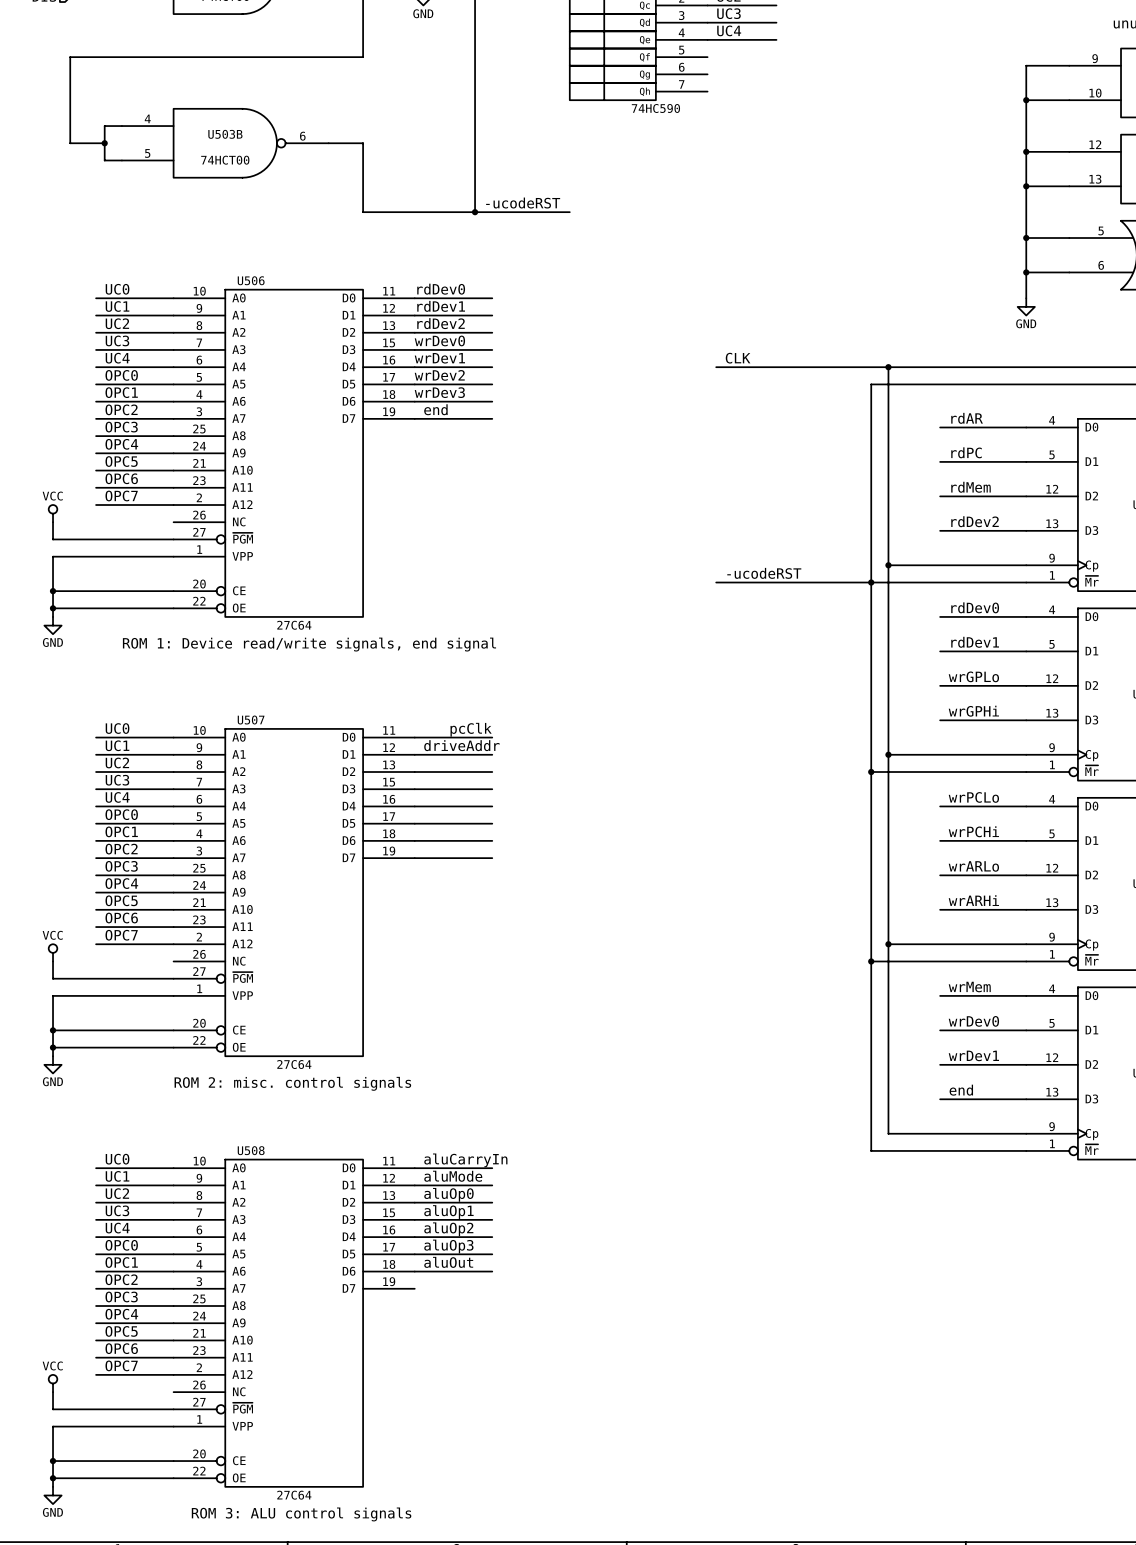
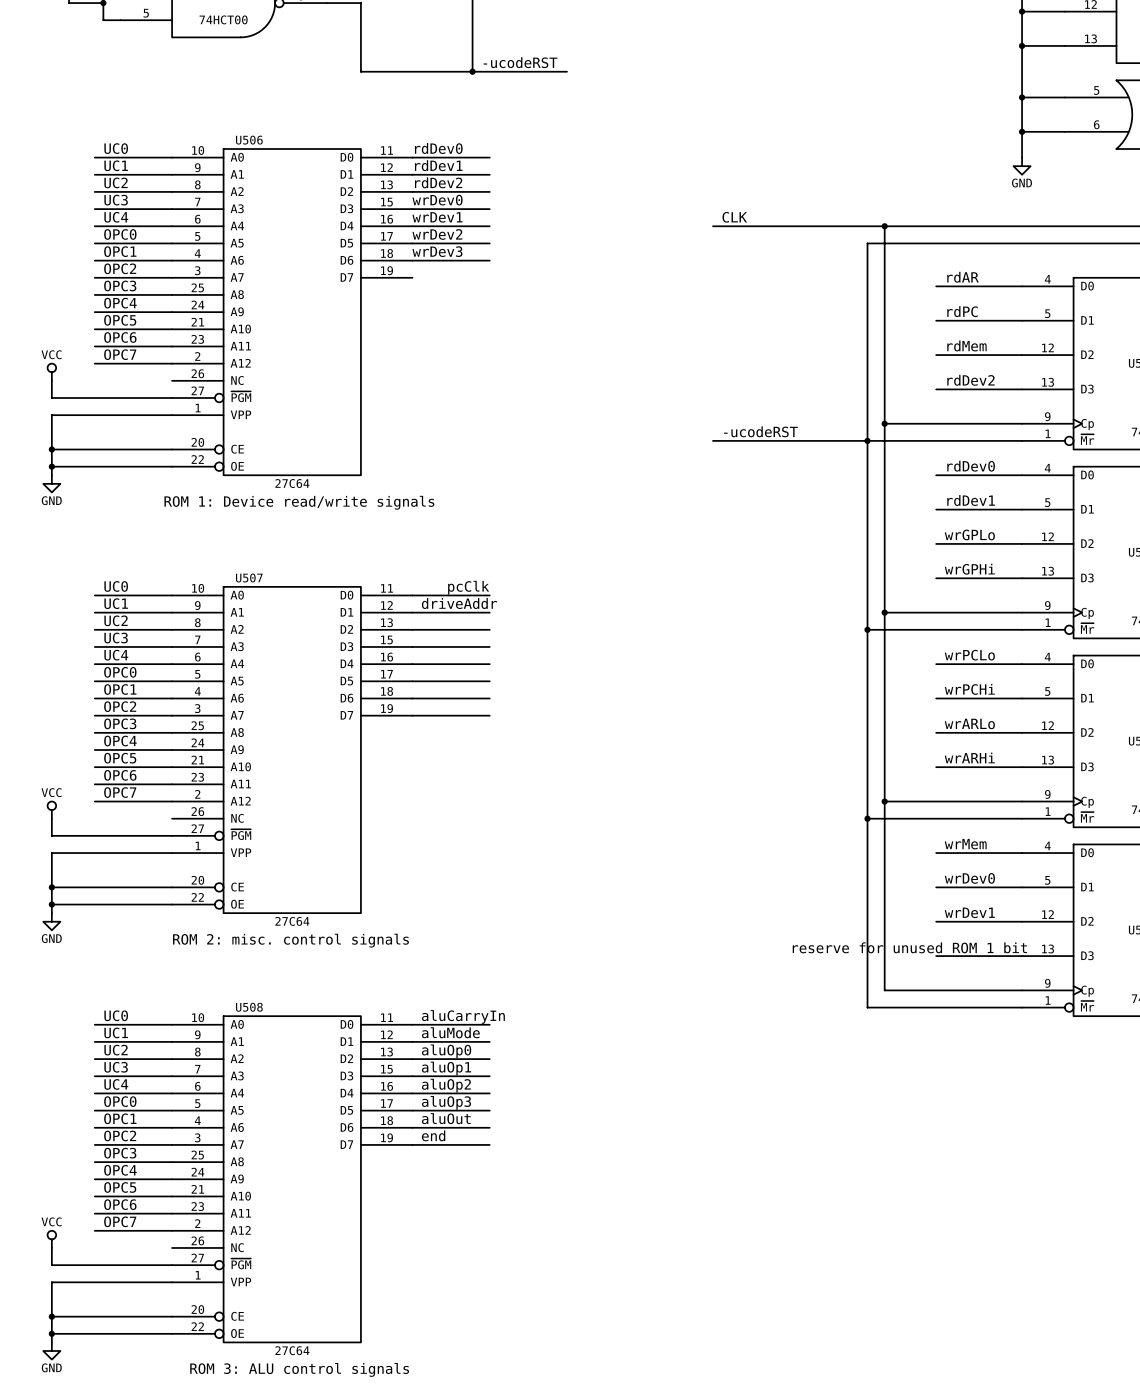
label: end (435, 409) -> none
wire: (414, 418) (492, 418) -> none
text: ROM 1: Device read/write signals, end signal (309, 644) -> ROM 1: Device read/write signals (299, 502)
label: end (961, 1090) -> none
text: none -> reserve for unused ROM 1 bit (909, 947)
label: none -> end (433, 1135)
wire: none -> (412, 1144) (489, 1144)

